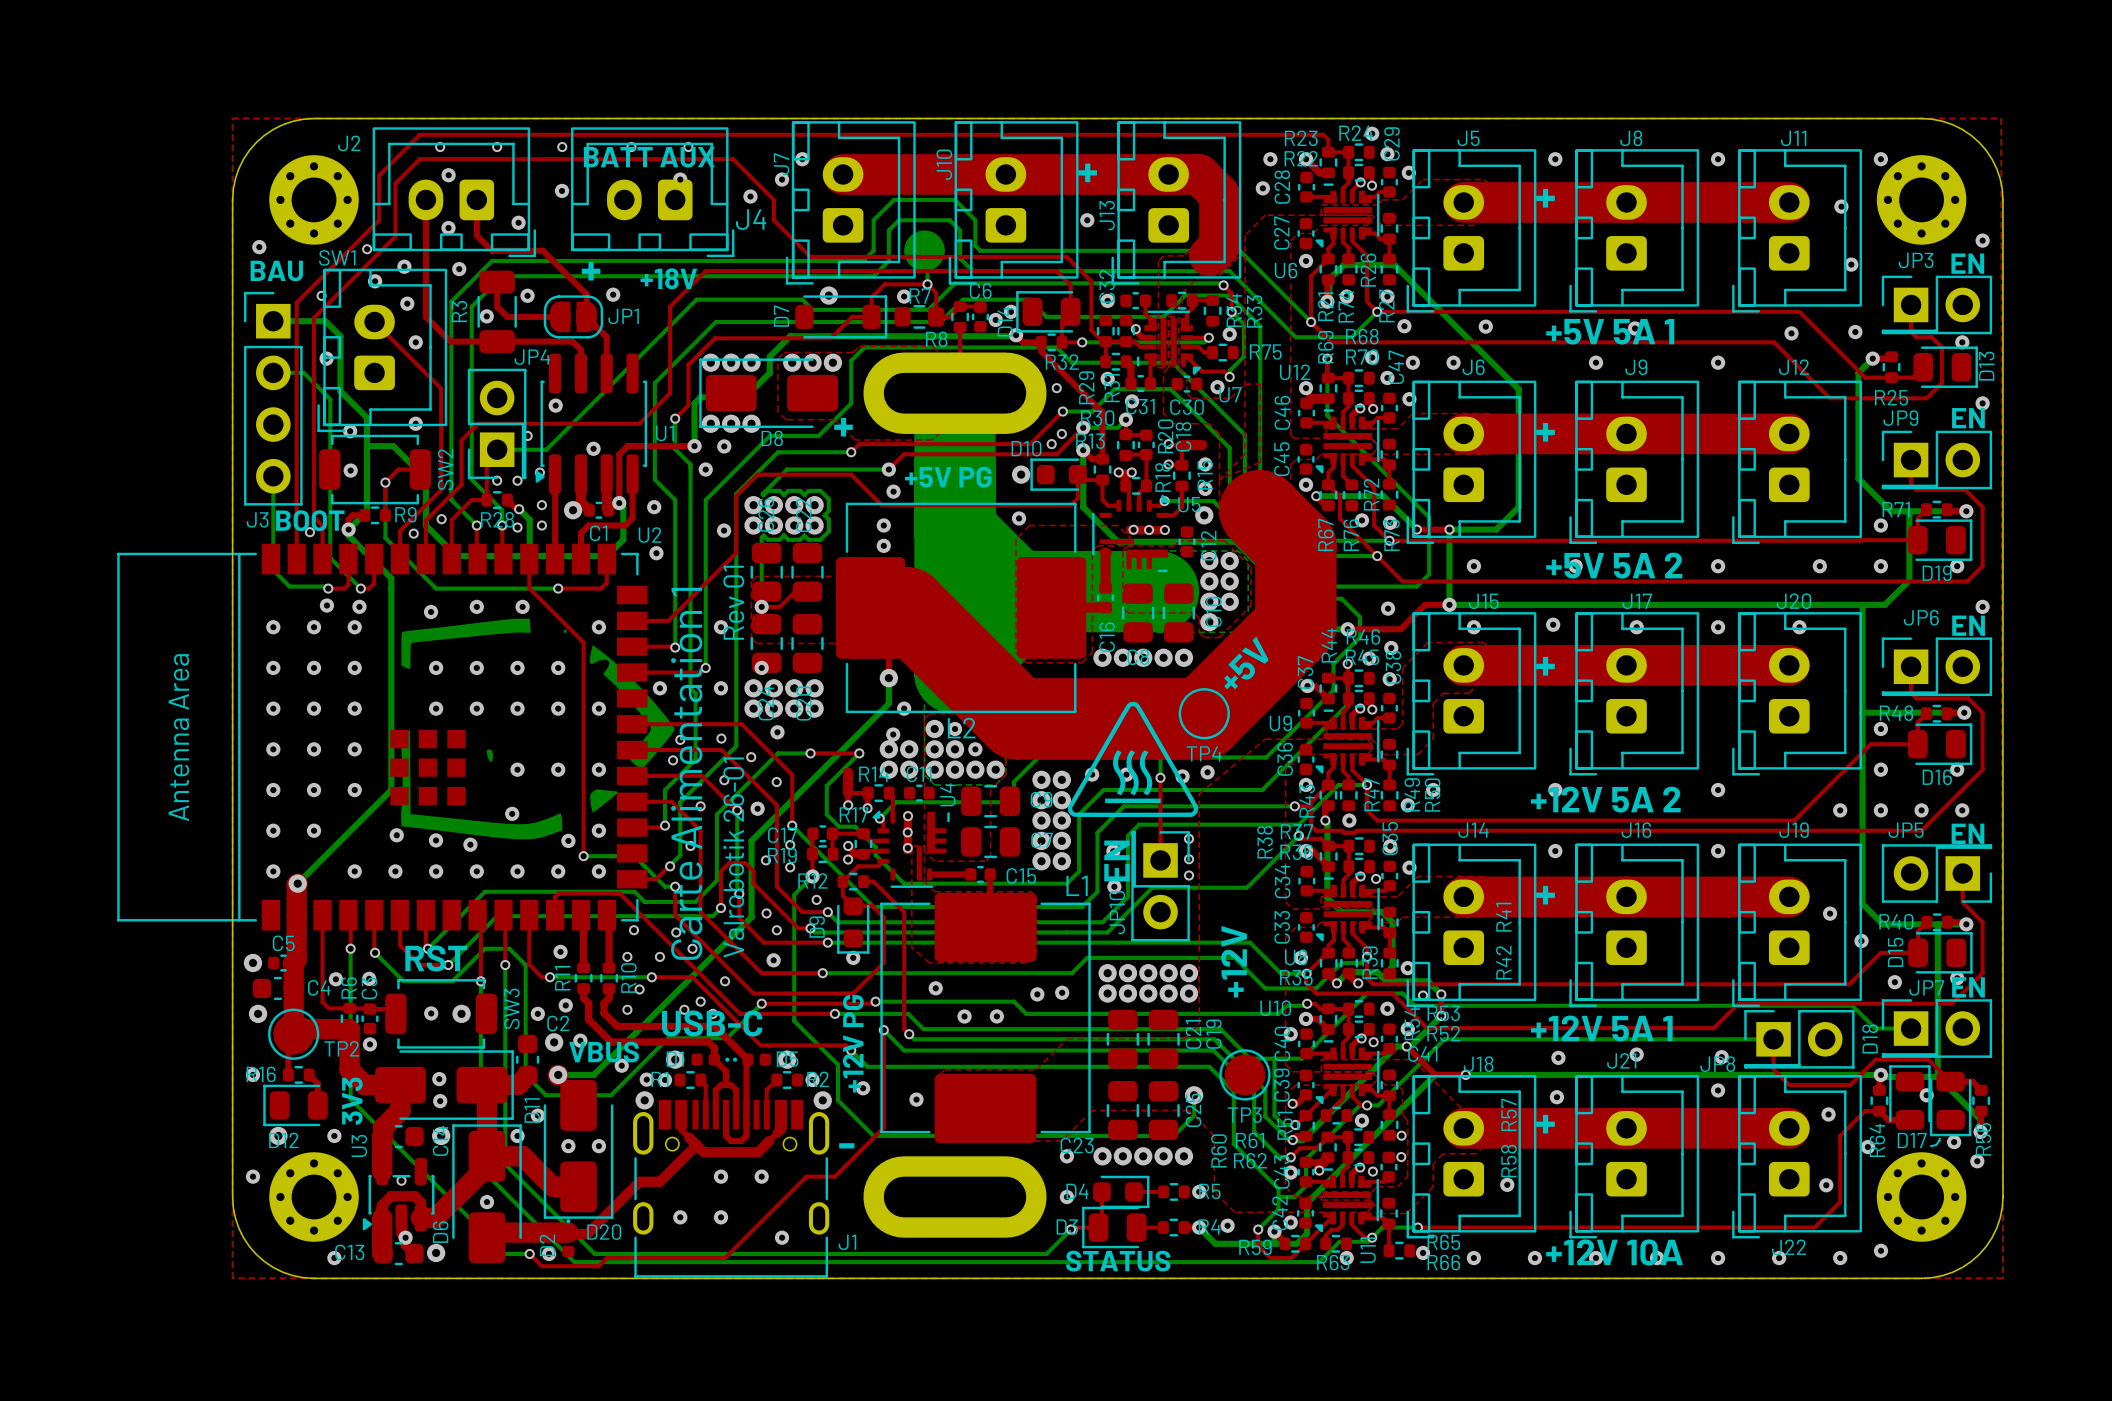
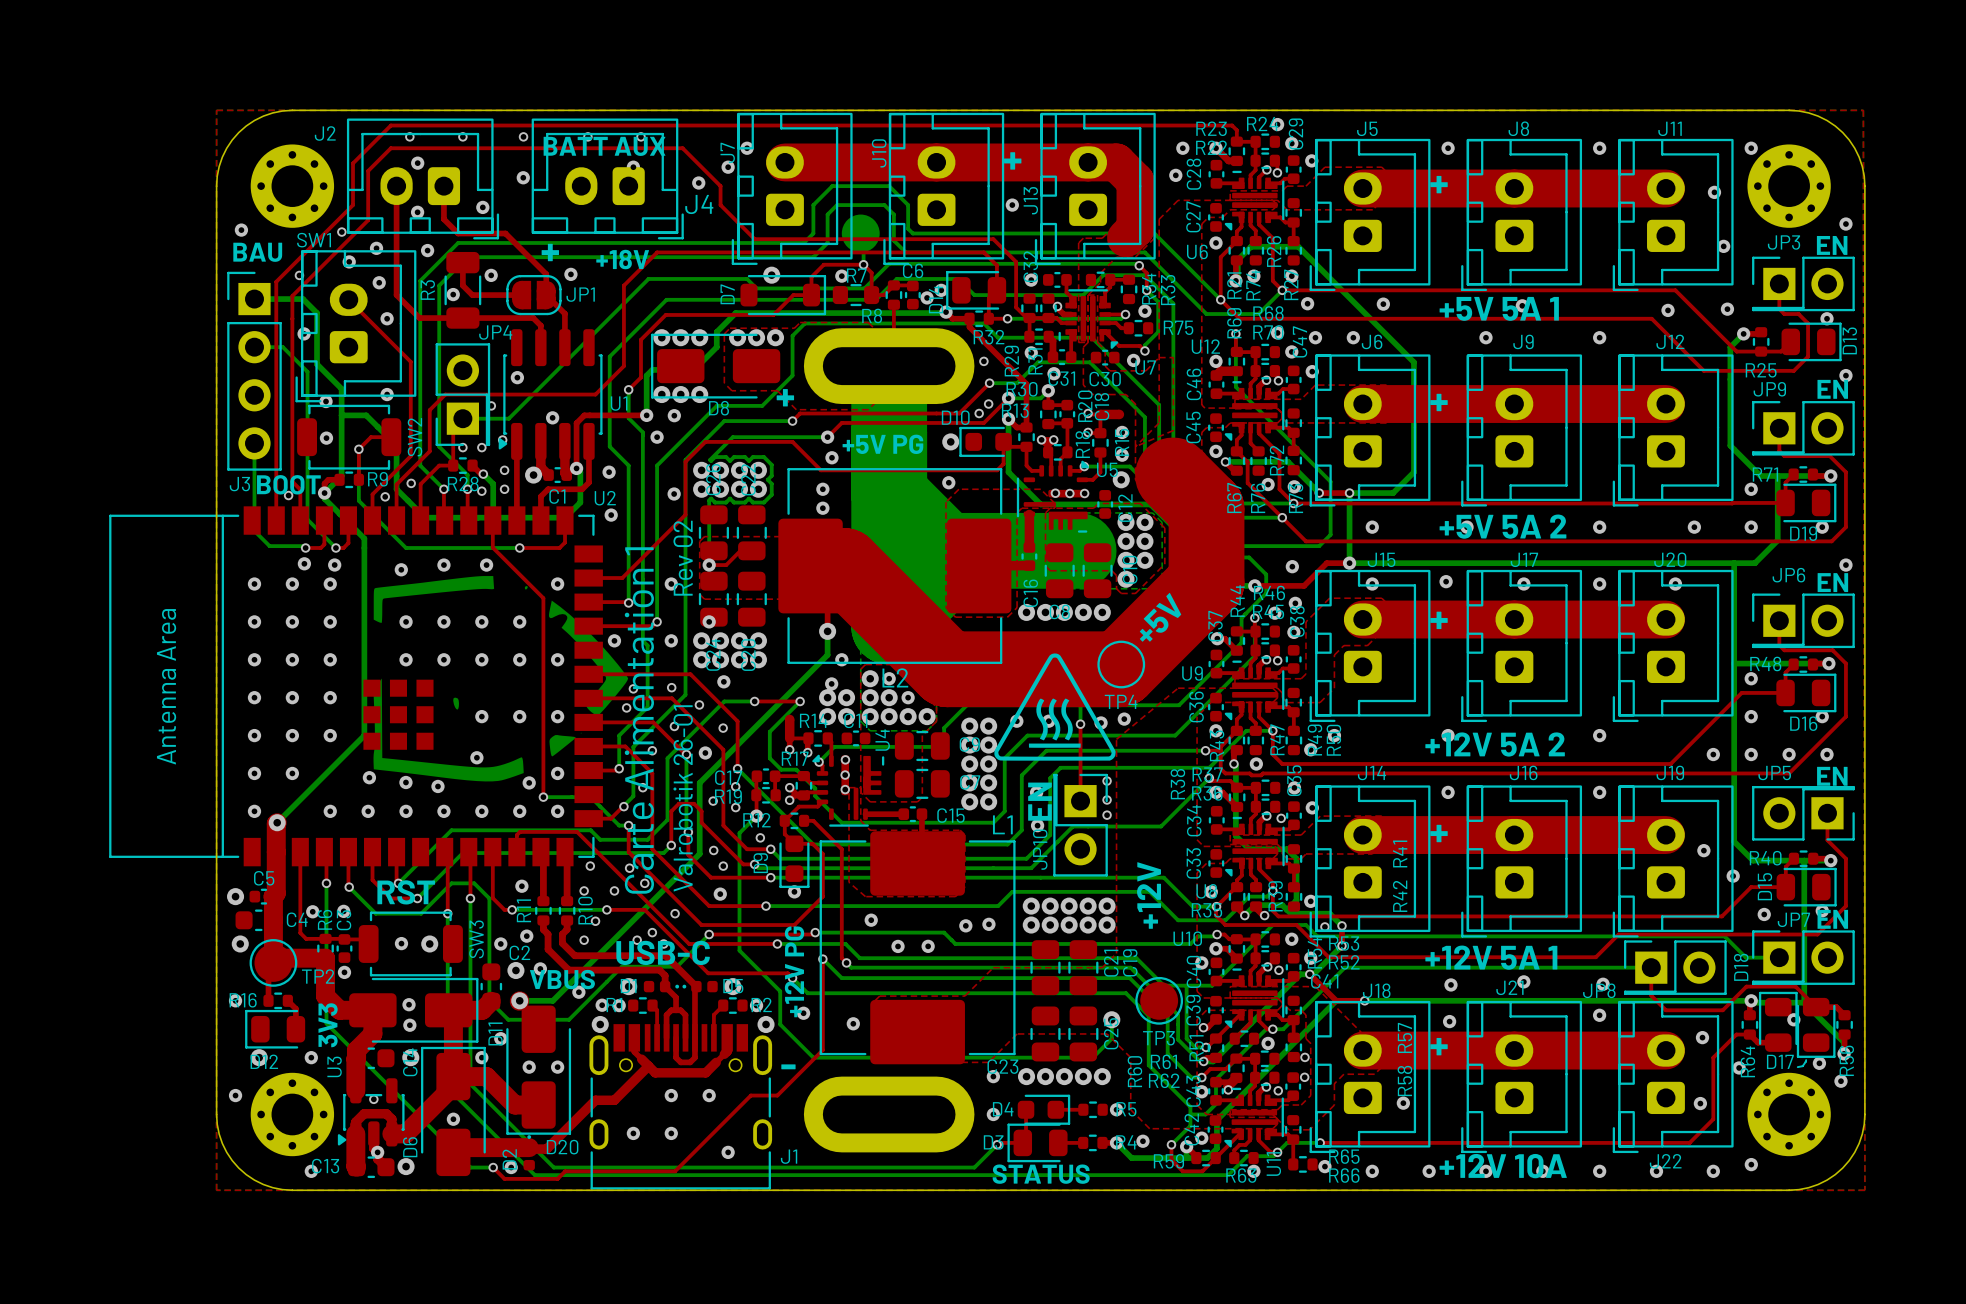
text: Rev 01 (733, 602) -> Rev 02 (683, 558)

